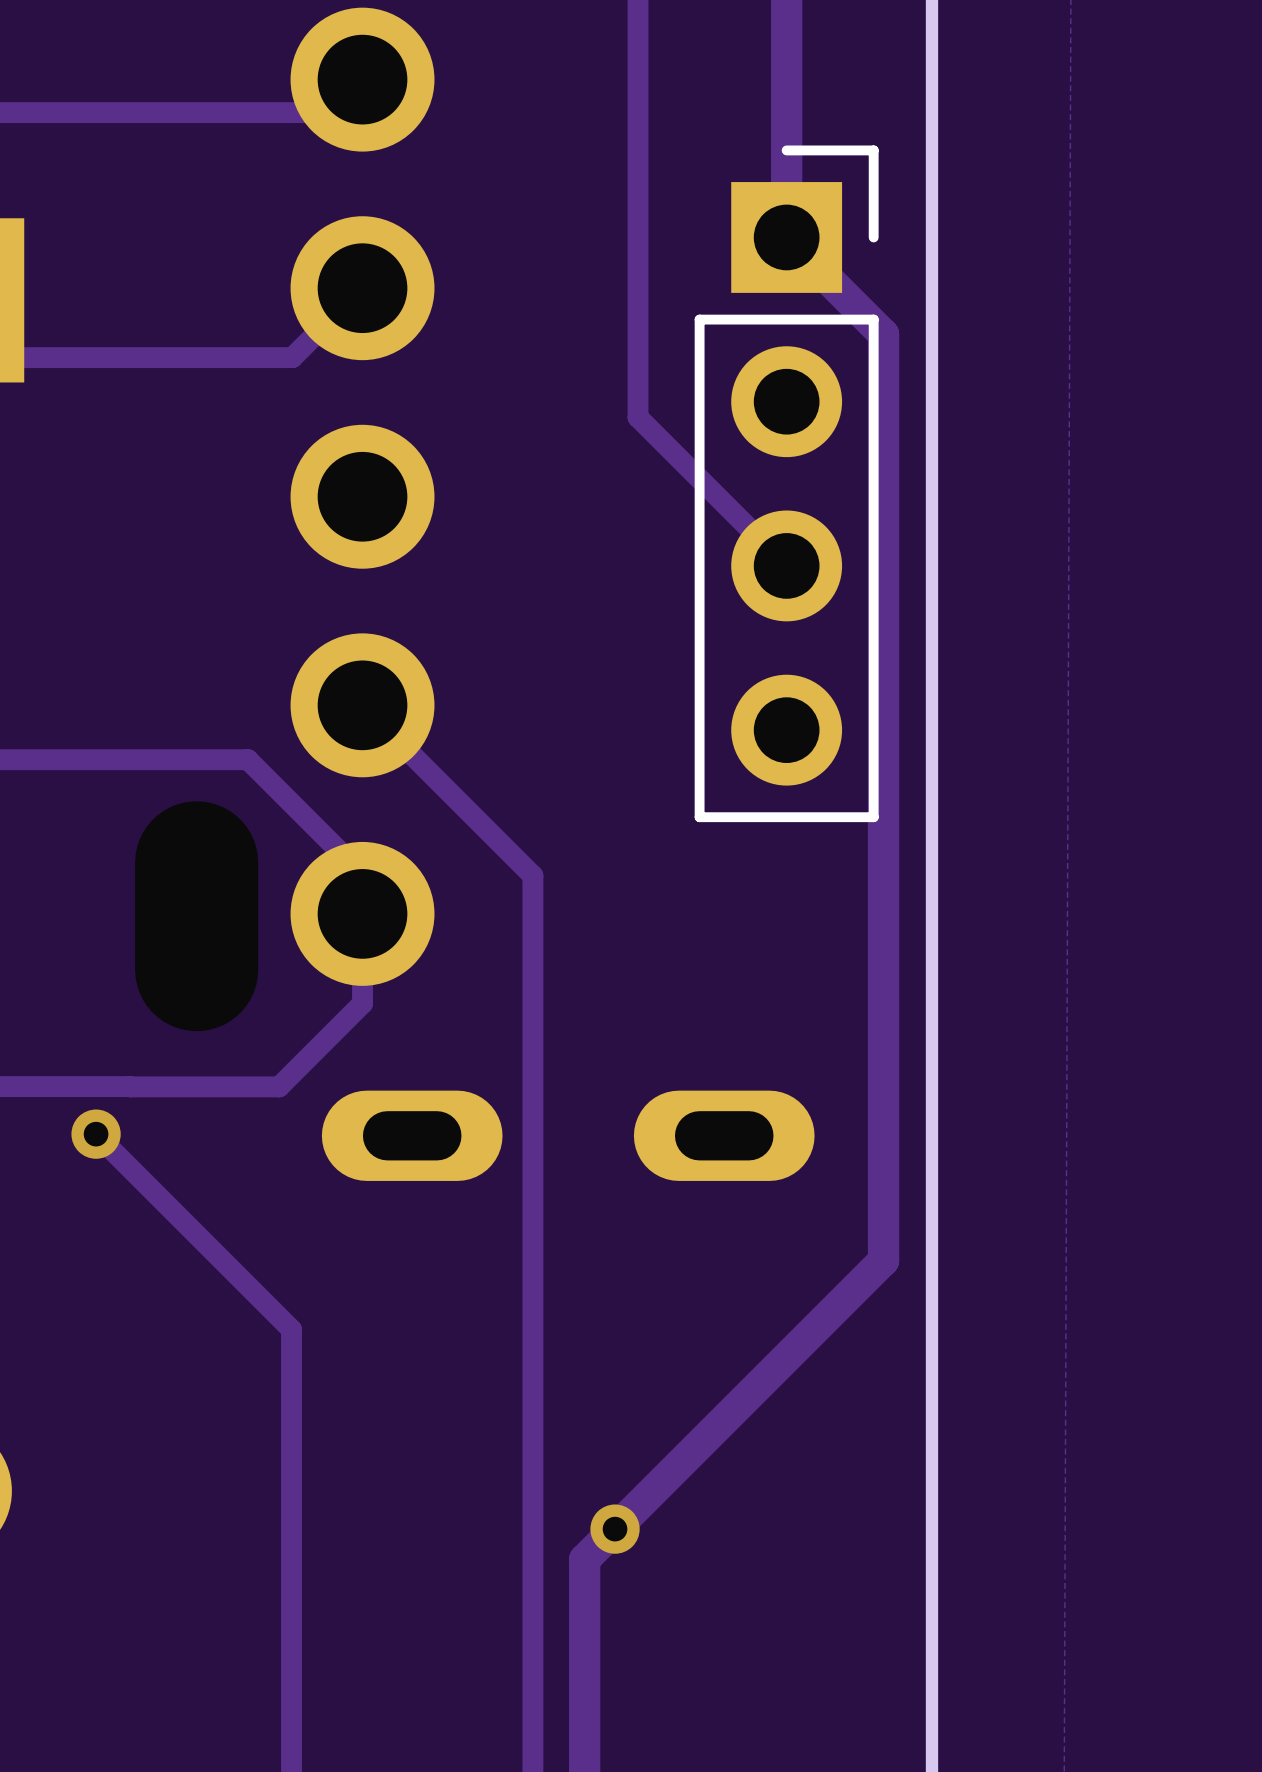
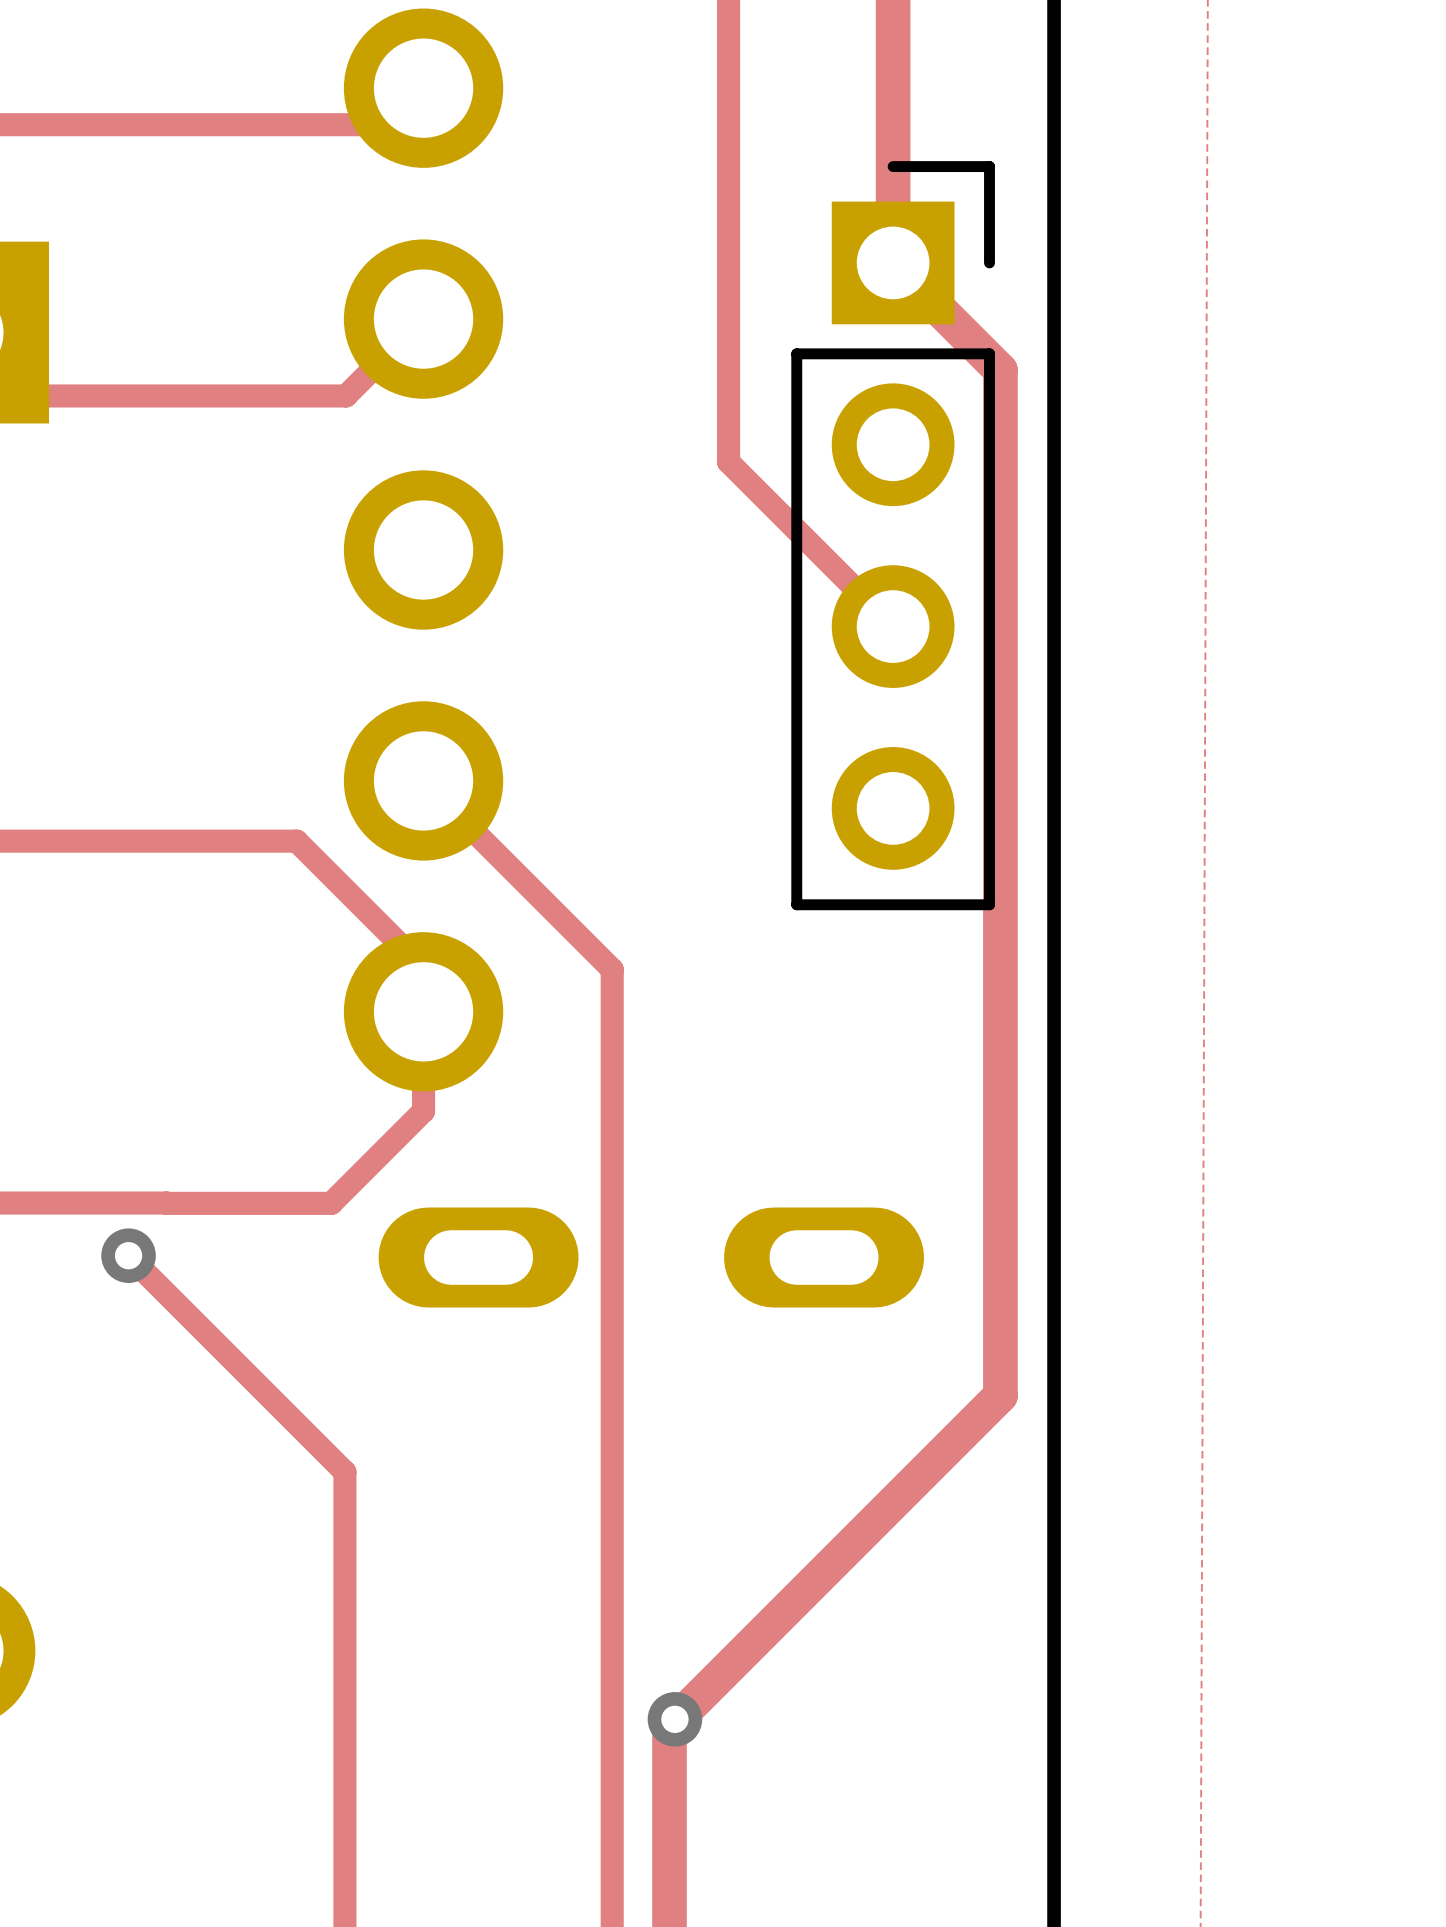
via position: (615, 1529) -> (674, 1719)

